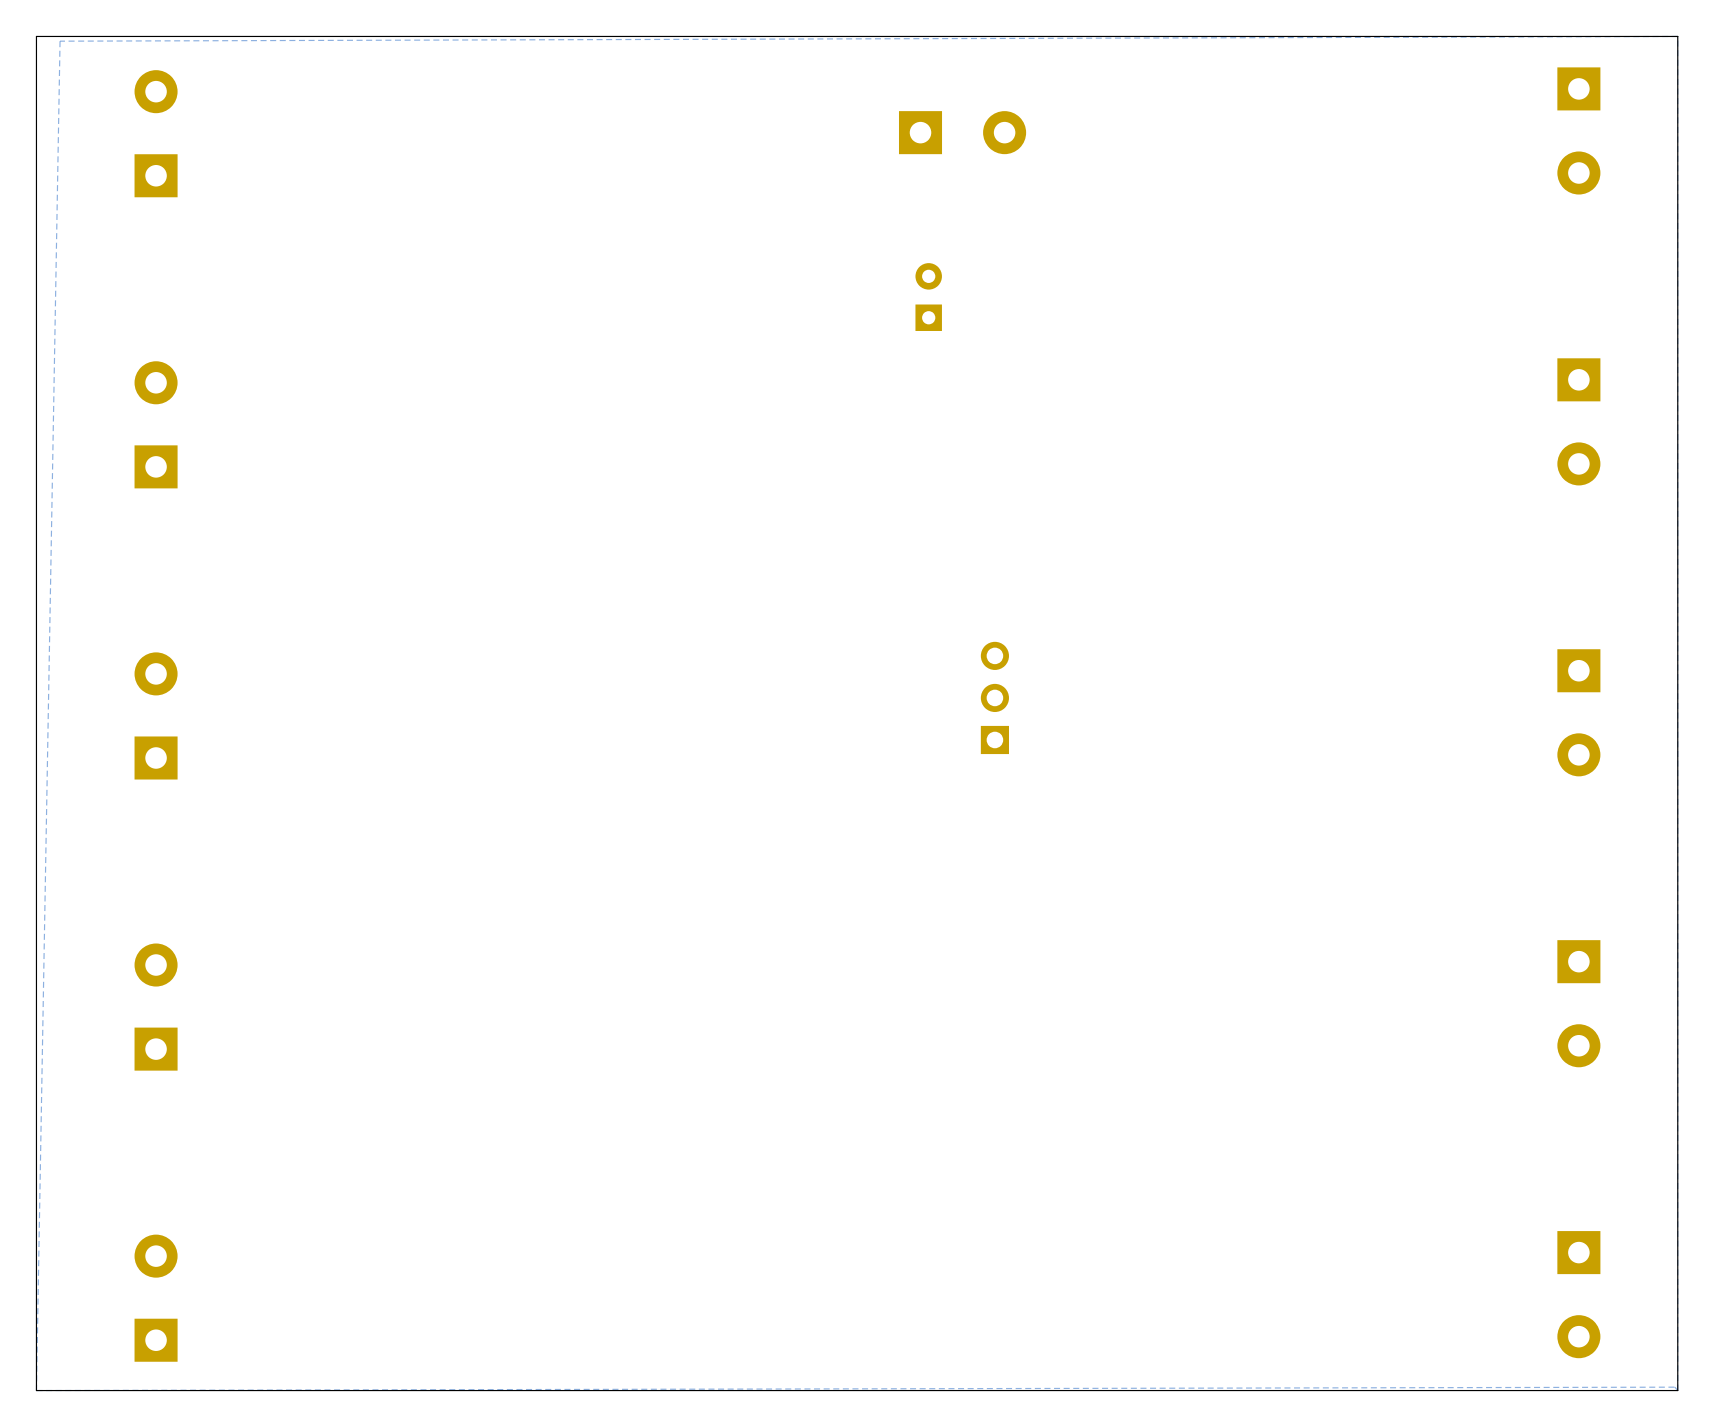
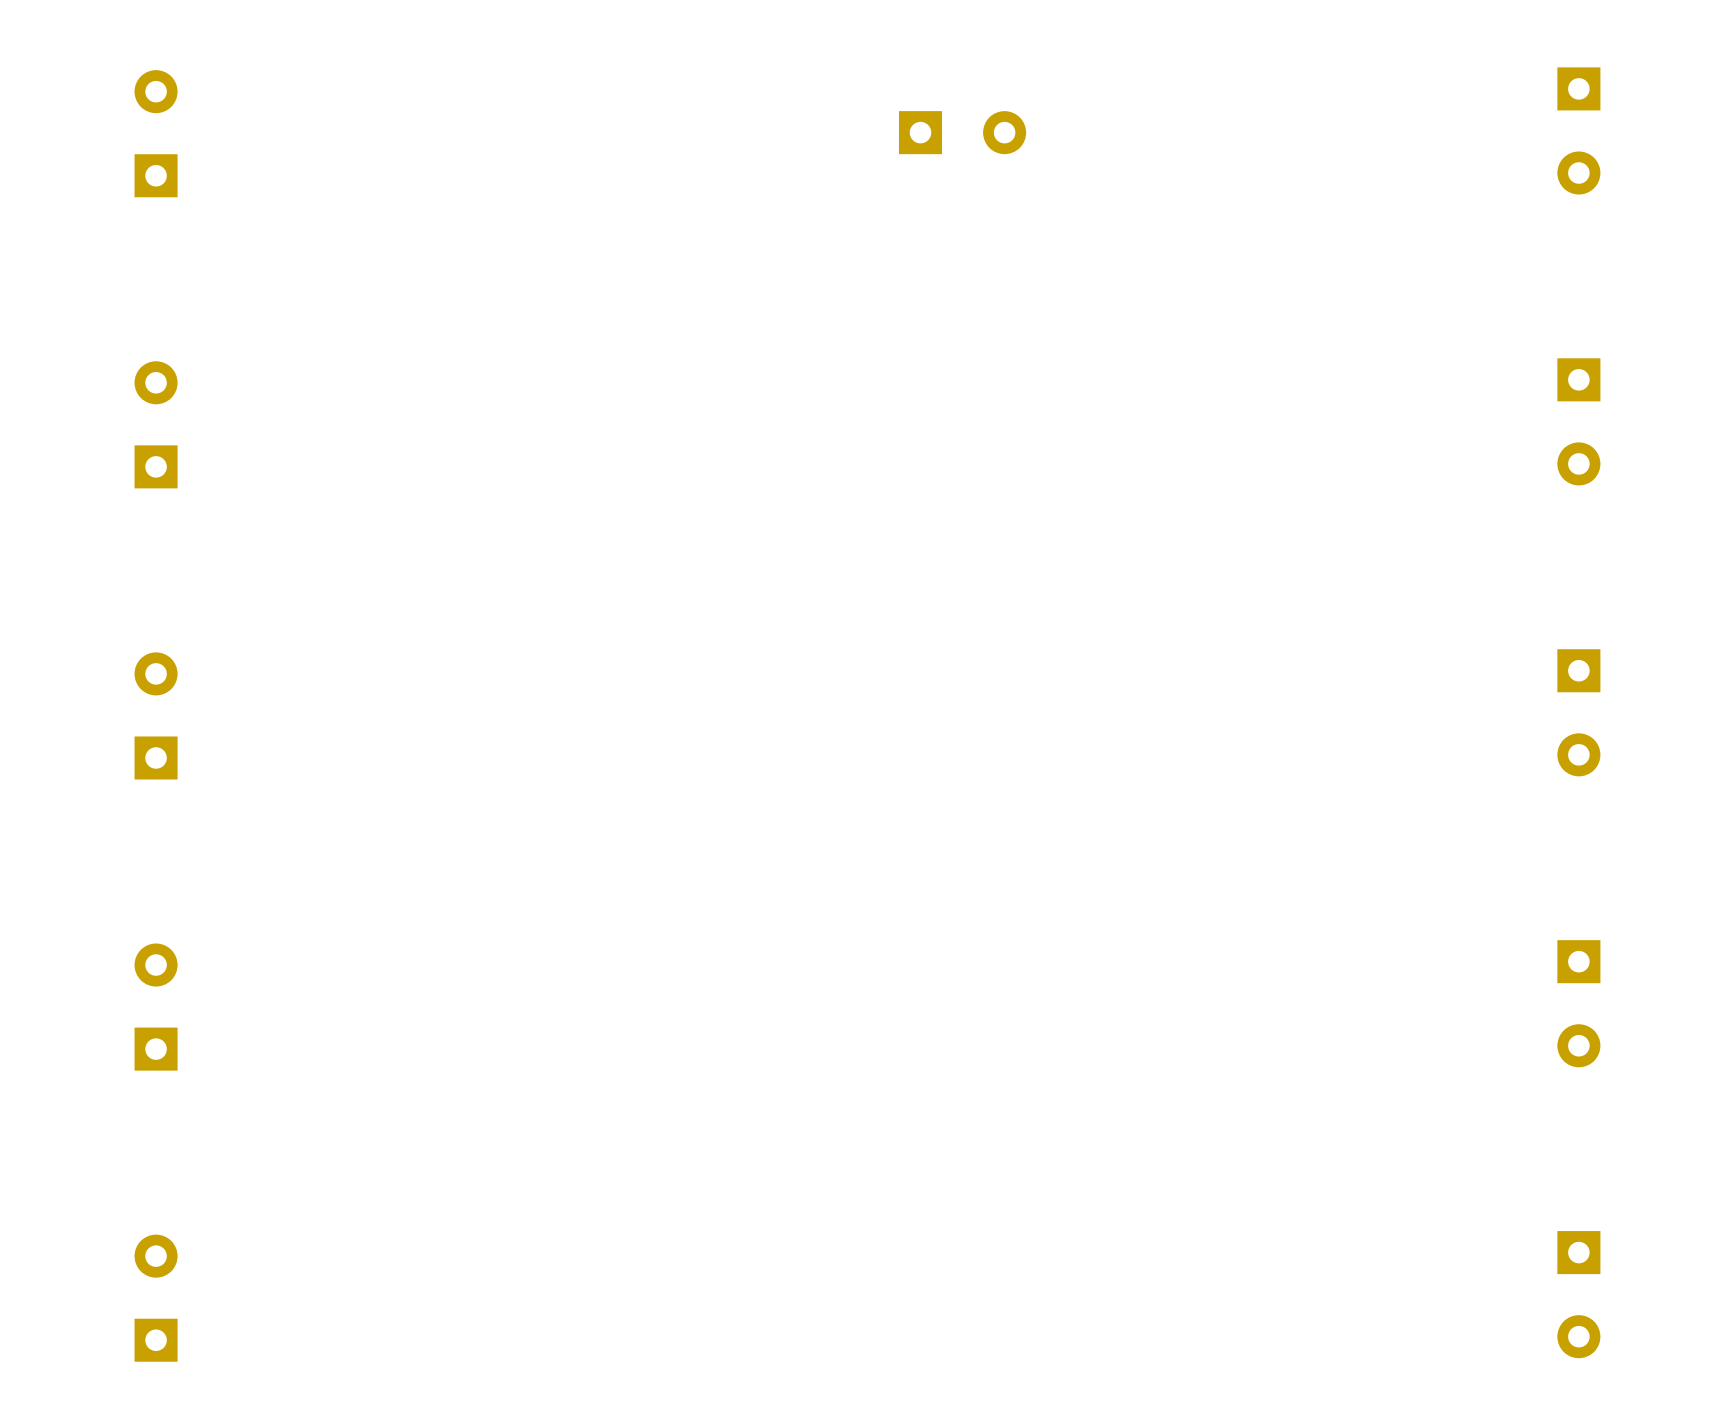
board edge: (1677, 36) (36, 36) (36, 1390) (1677, 1390) (1677, 36) -> none
zone outline: (1677, 36) (60, 41) (36, 1390) (1674, 1387) (1677, 1390) (1677, 36) -> none
part: (928, 297) -> none
part: (994, 697) -> none

